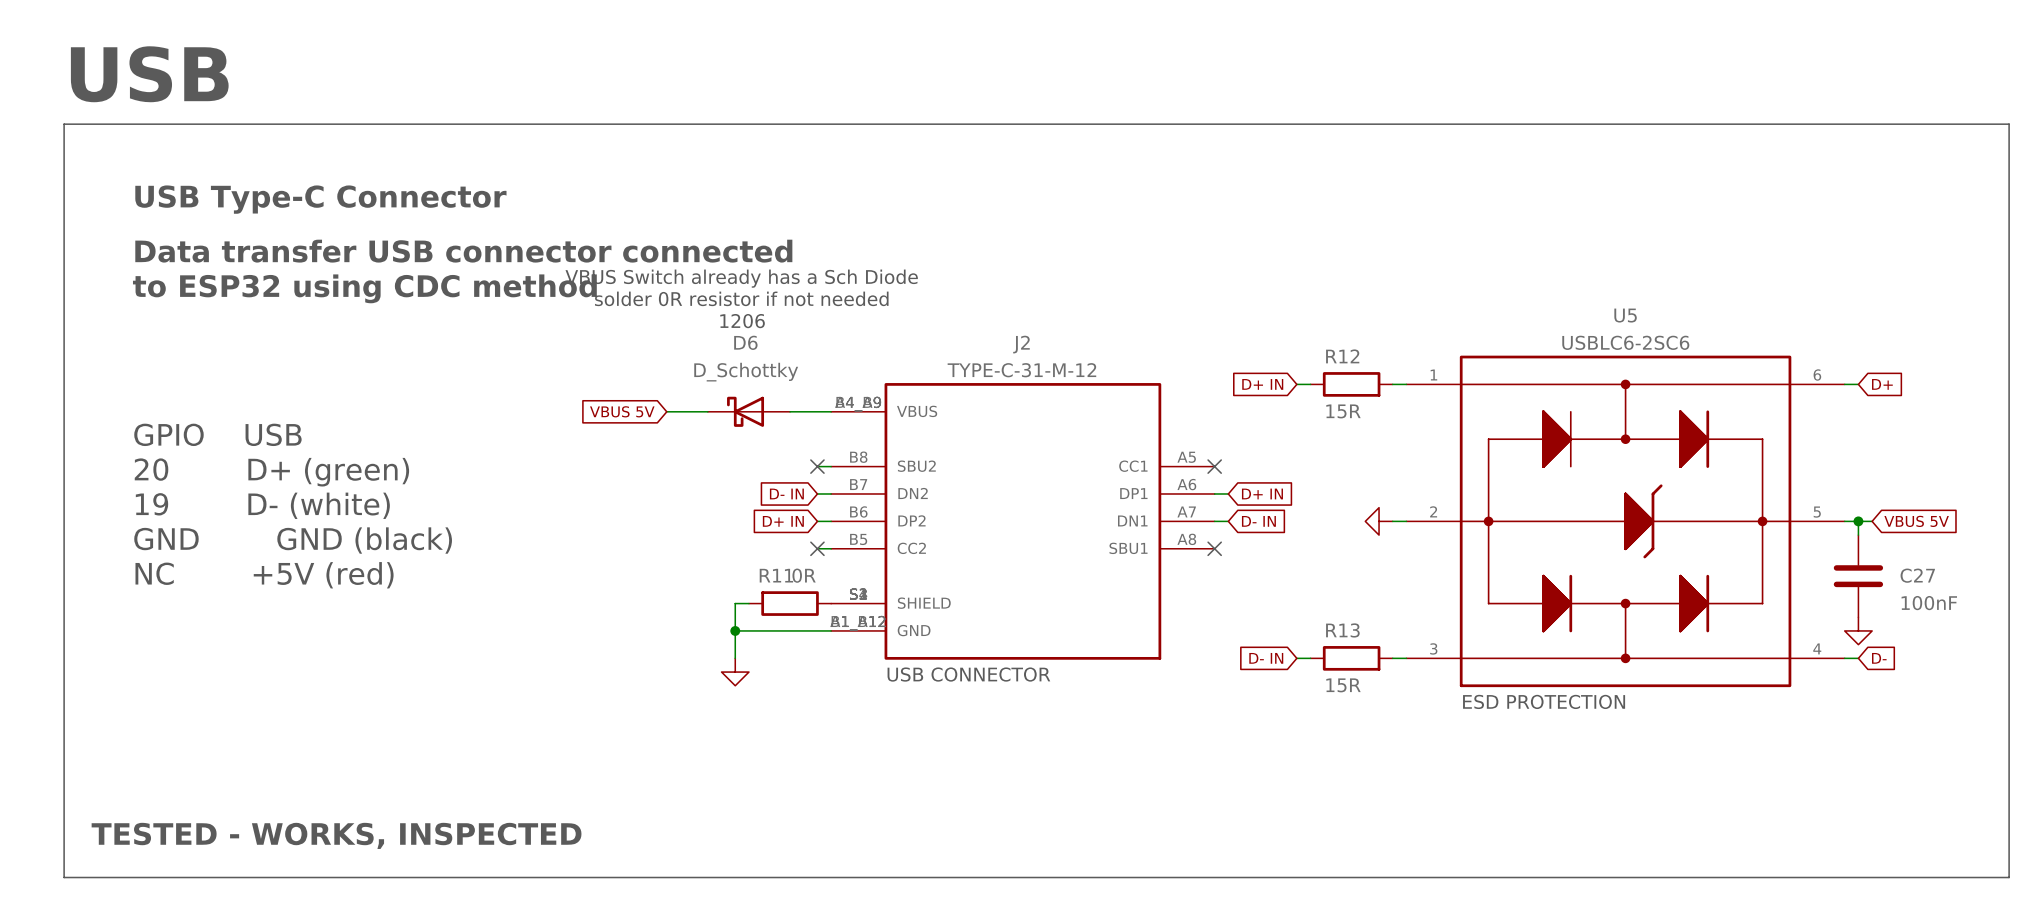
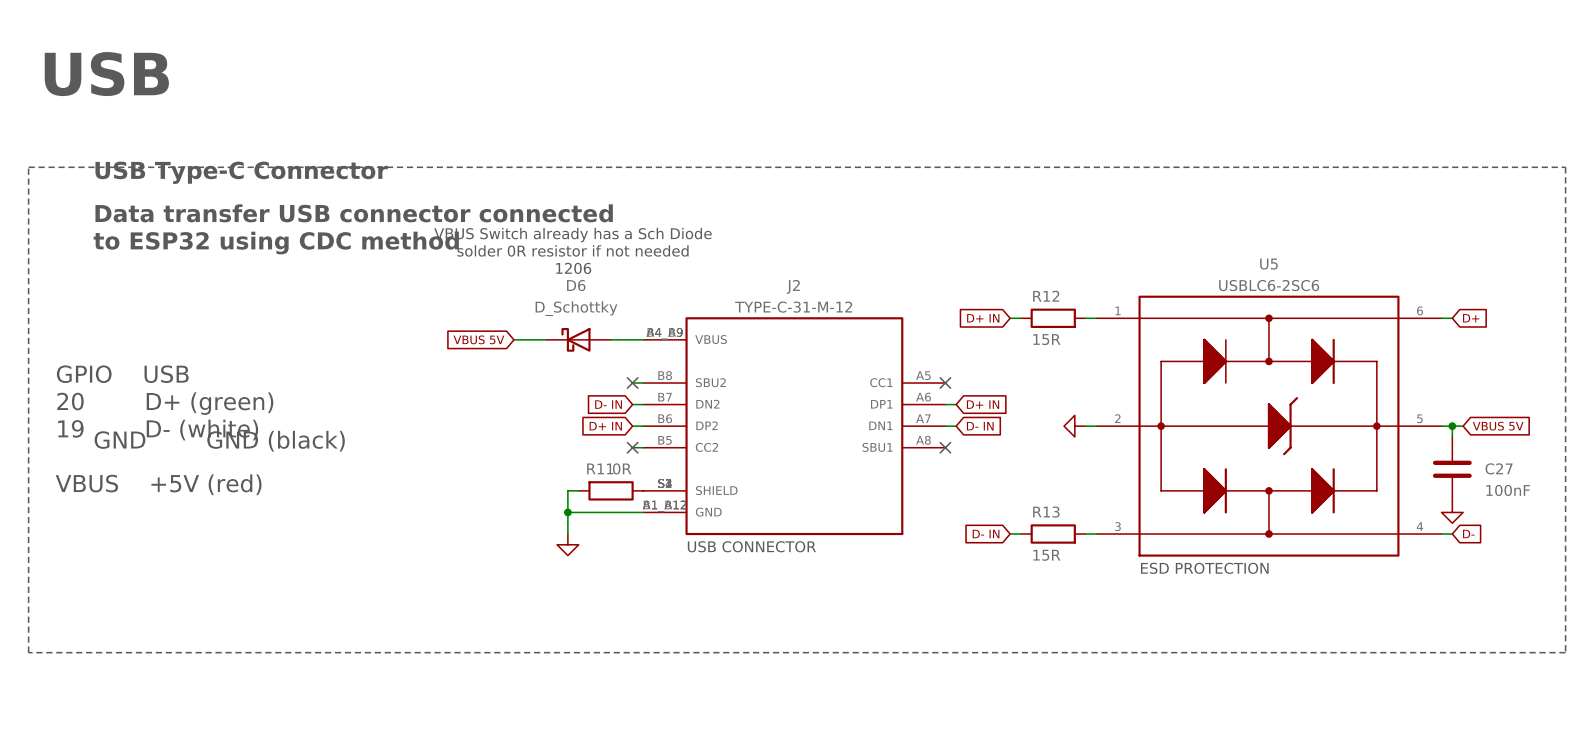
line: (64, 124) (2009, 124) (2009, 877) (64, 877) (64, 124) -> (28, 167) (28, 652) (1565, 652) (1565, 167) (28, 167)
text position: GPIO USB (217, 434) -> GPIO USB (122, 374)
text position: 20 D+ (green) (271, 472) -> 20 D+ (green) (165, 403)
text position: 19 D- (white) (262, 505) -> 19 D- (white) (158, 430)
text: NC +5V (red) (264, 575) -> VBUS +5V (red) (158, 484)
text: TESTED - WORKS, INSPECTED (336, 835) -> none

